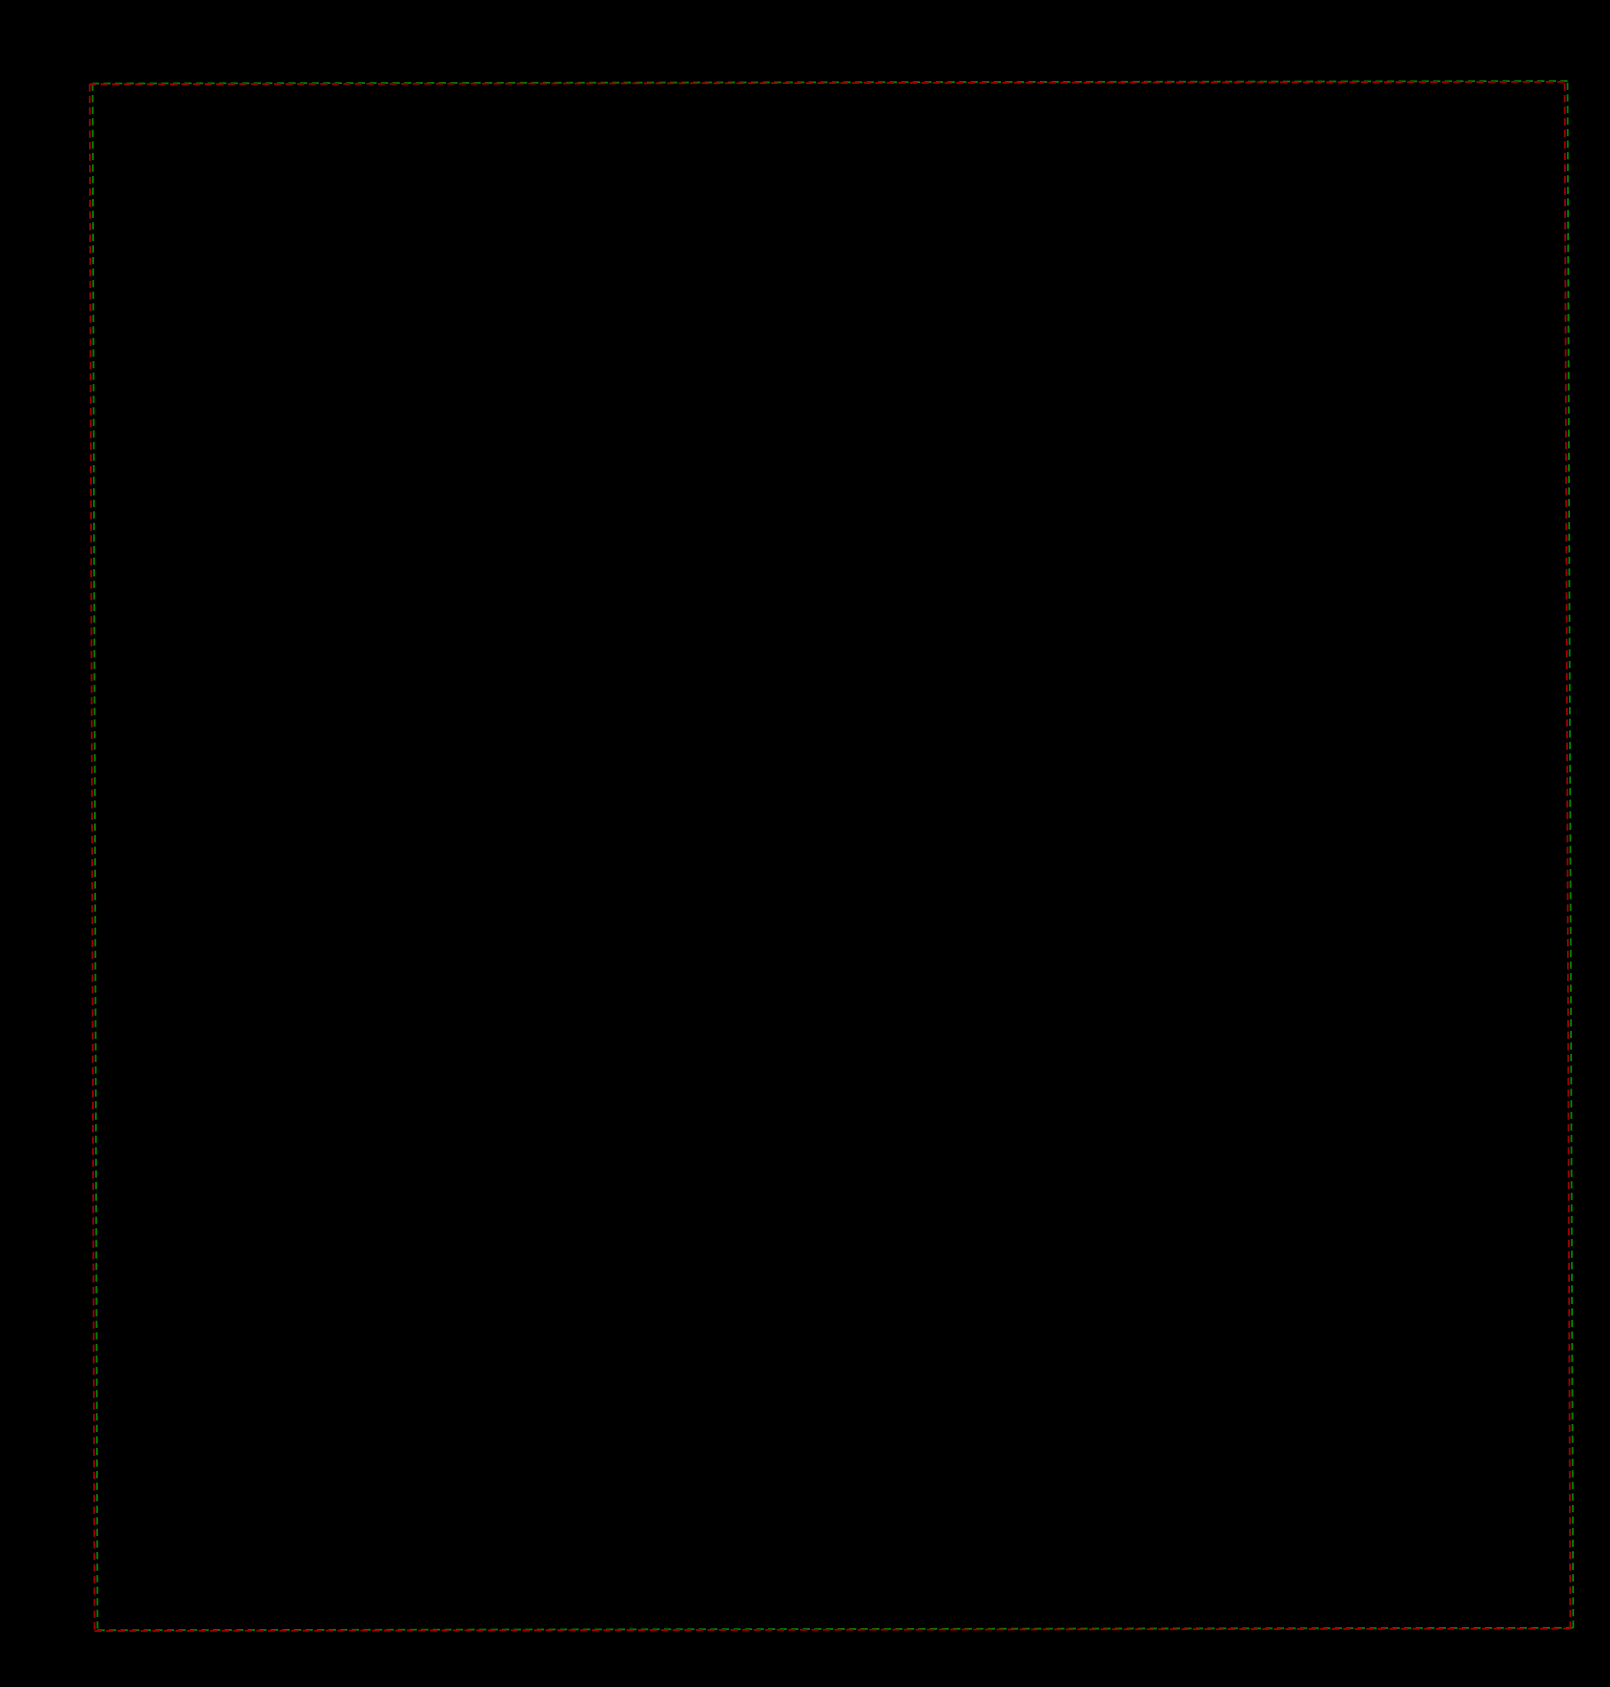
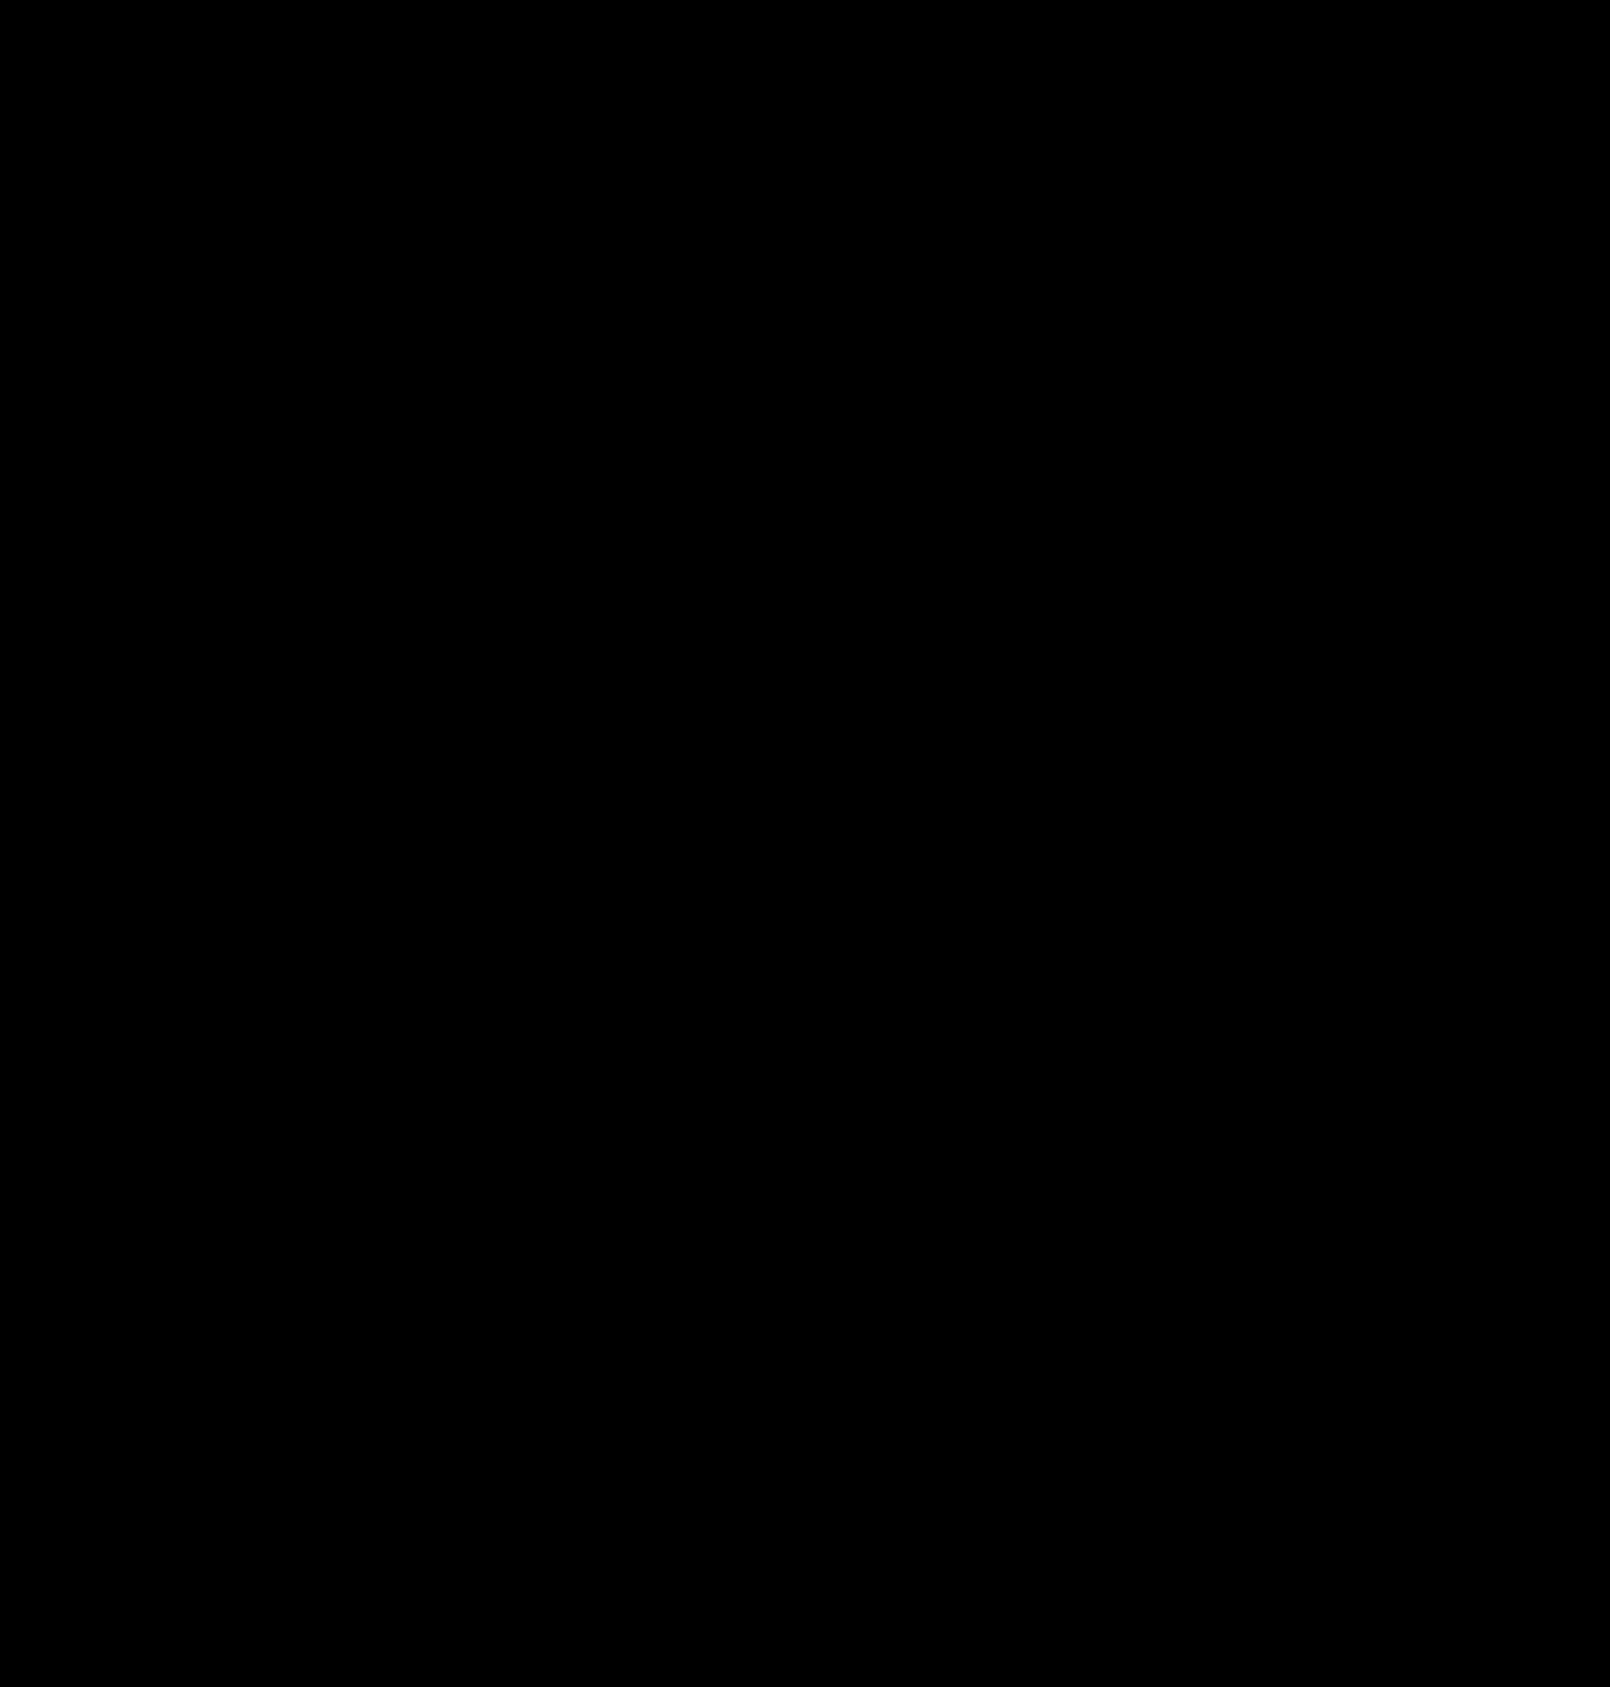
top zone outline: (1564, 81) (89, 84) (94, 1630) (1570, 1628) (1564, 81) -> none
bottom zone outline: (1567, 81) (92, 83) (97, 1630) (1573, 1627) (1567, 81) -> none

